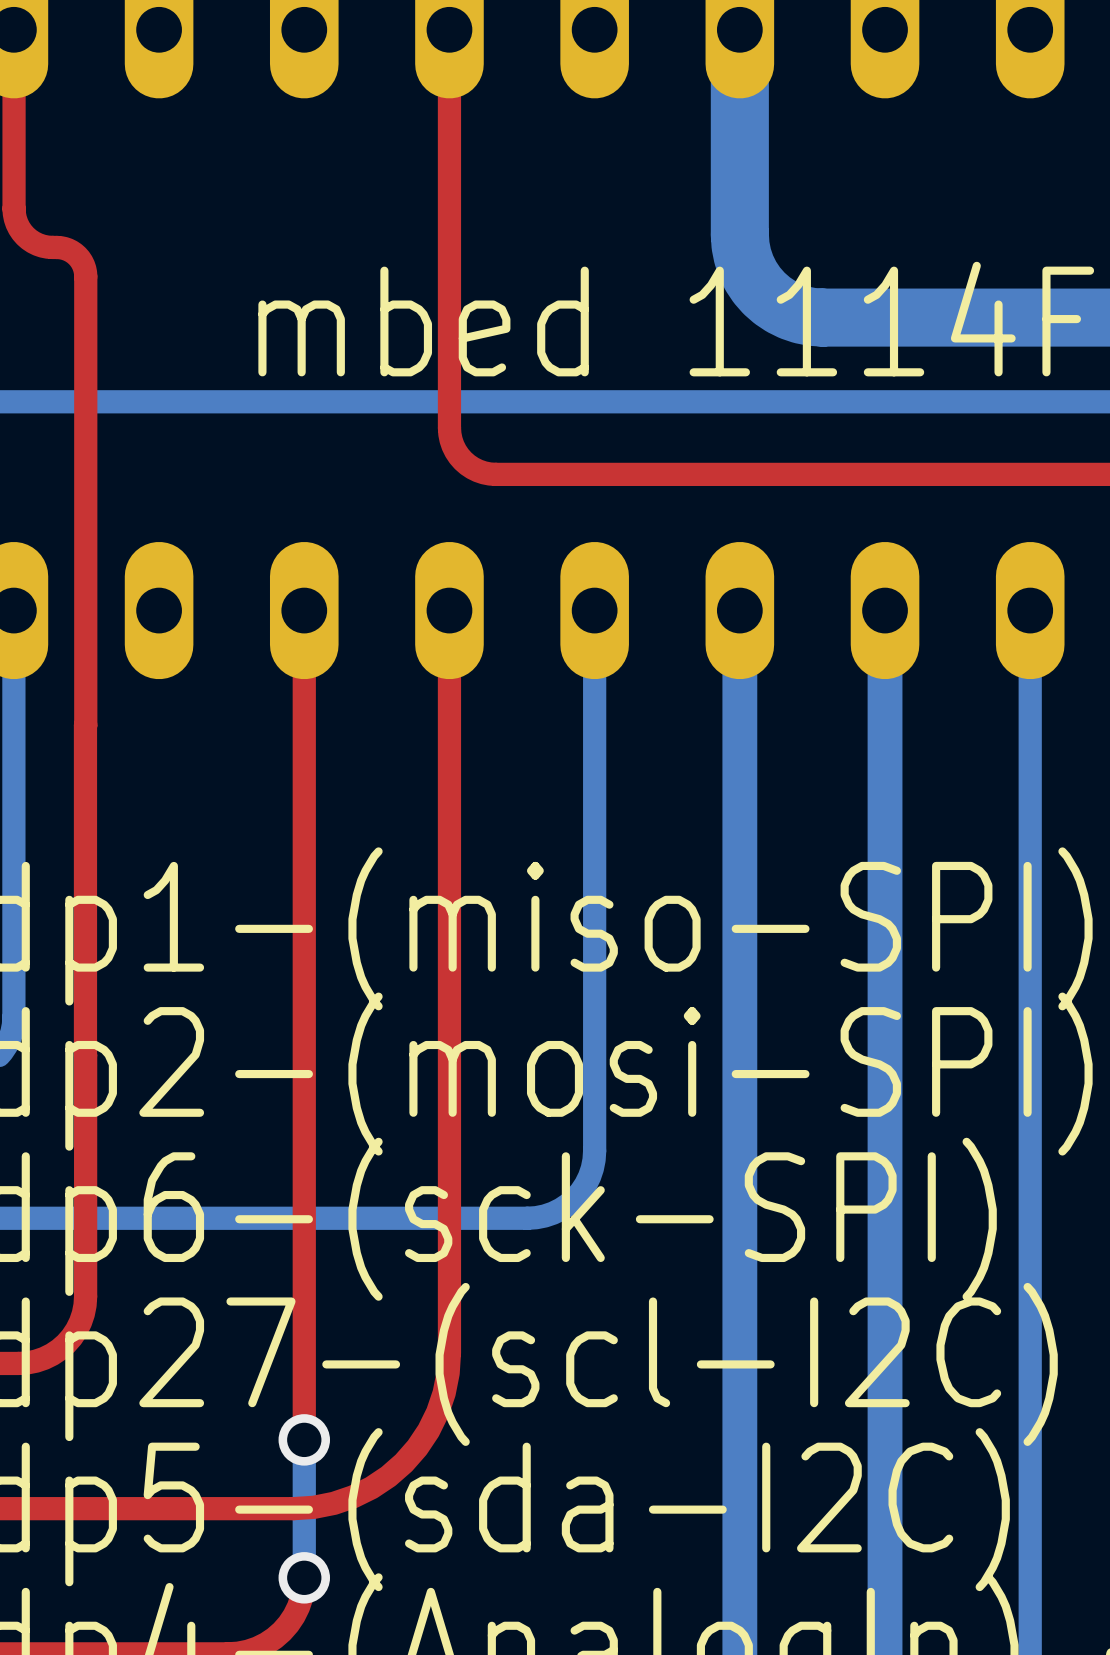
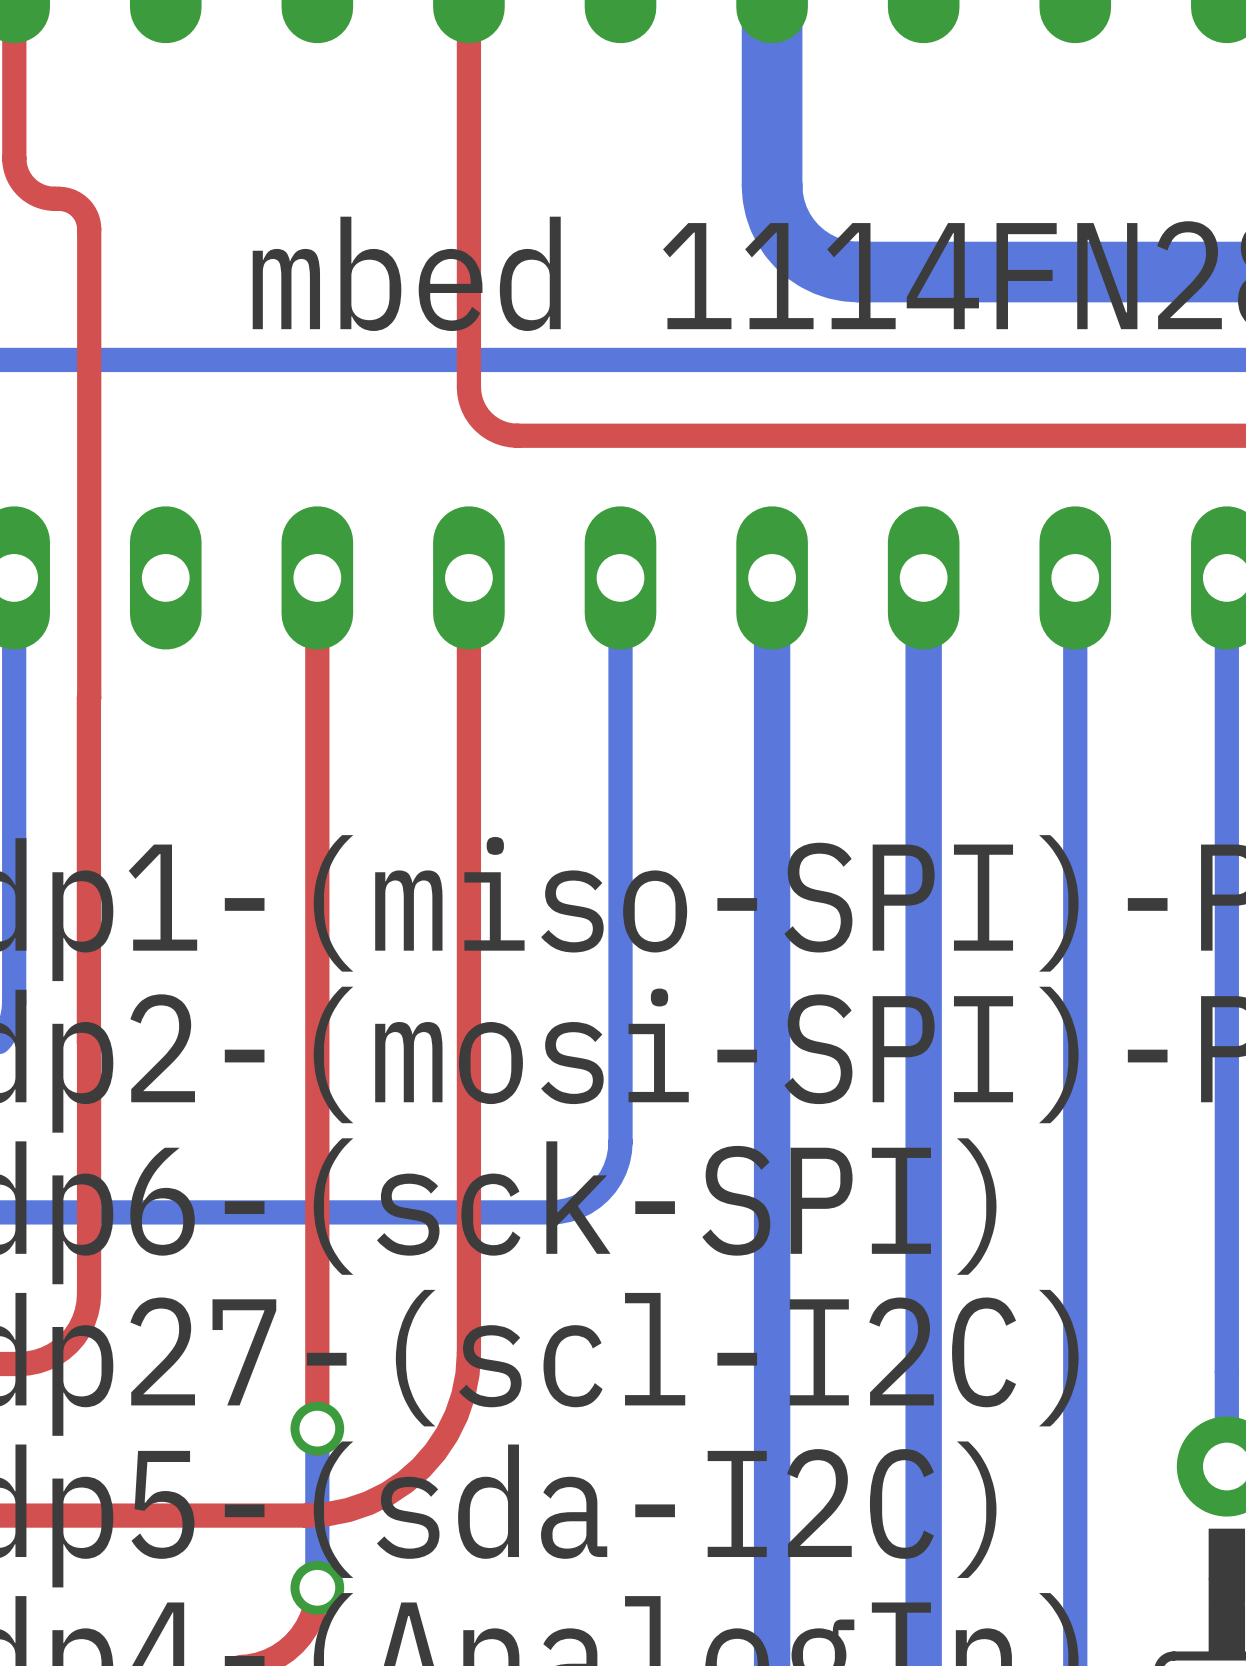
via position: (304, 1439) -> (317, 1428)

